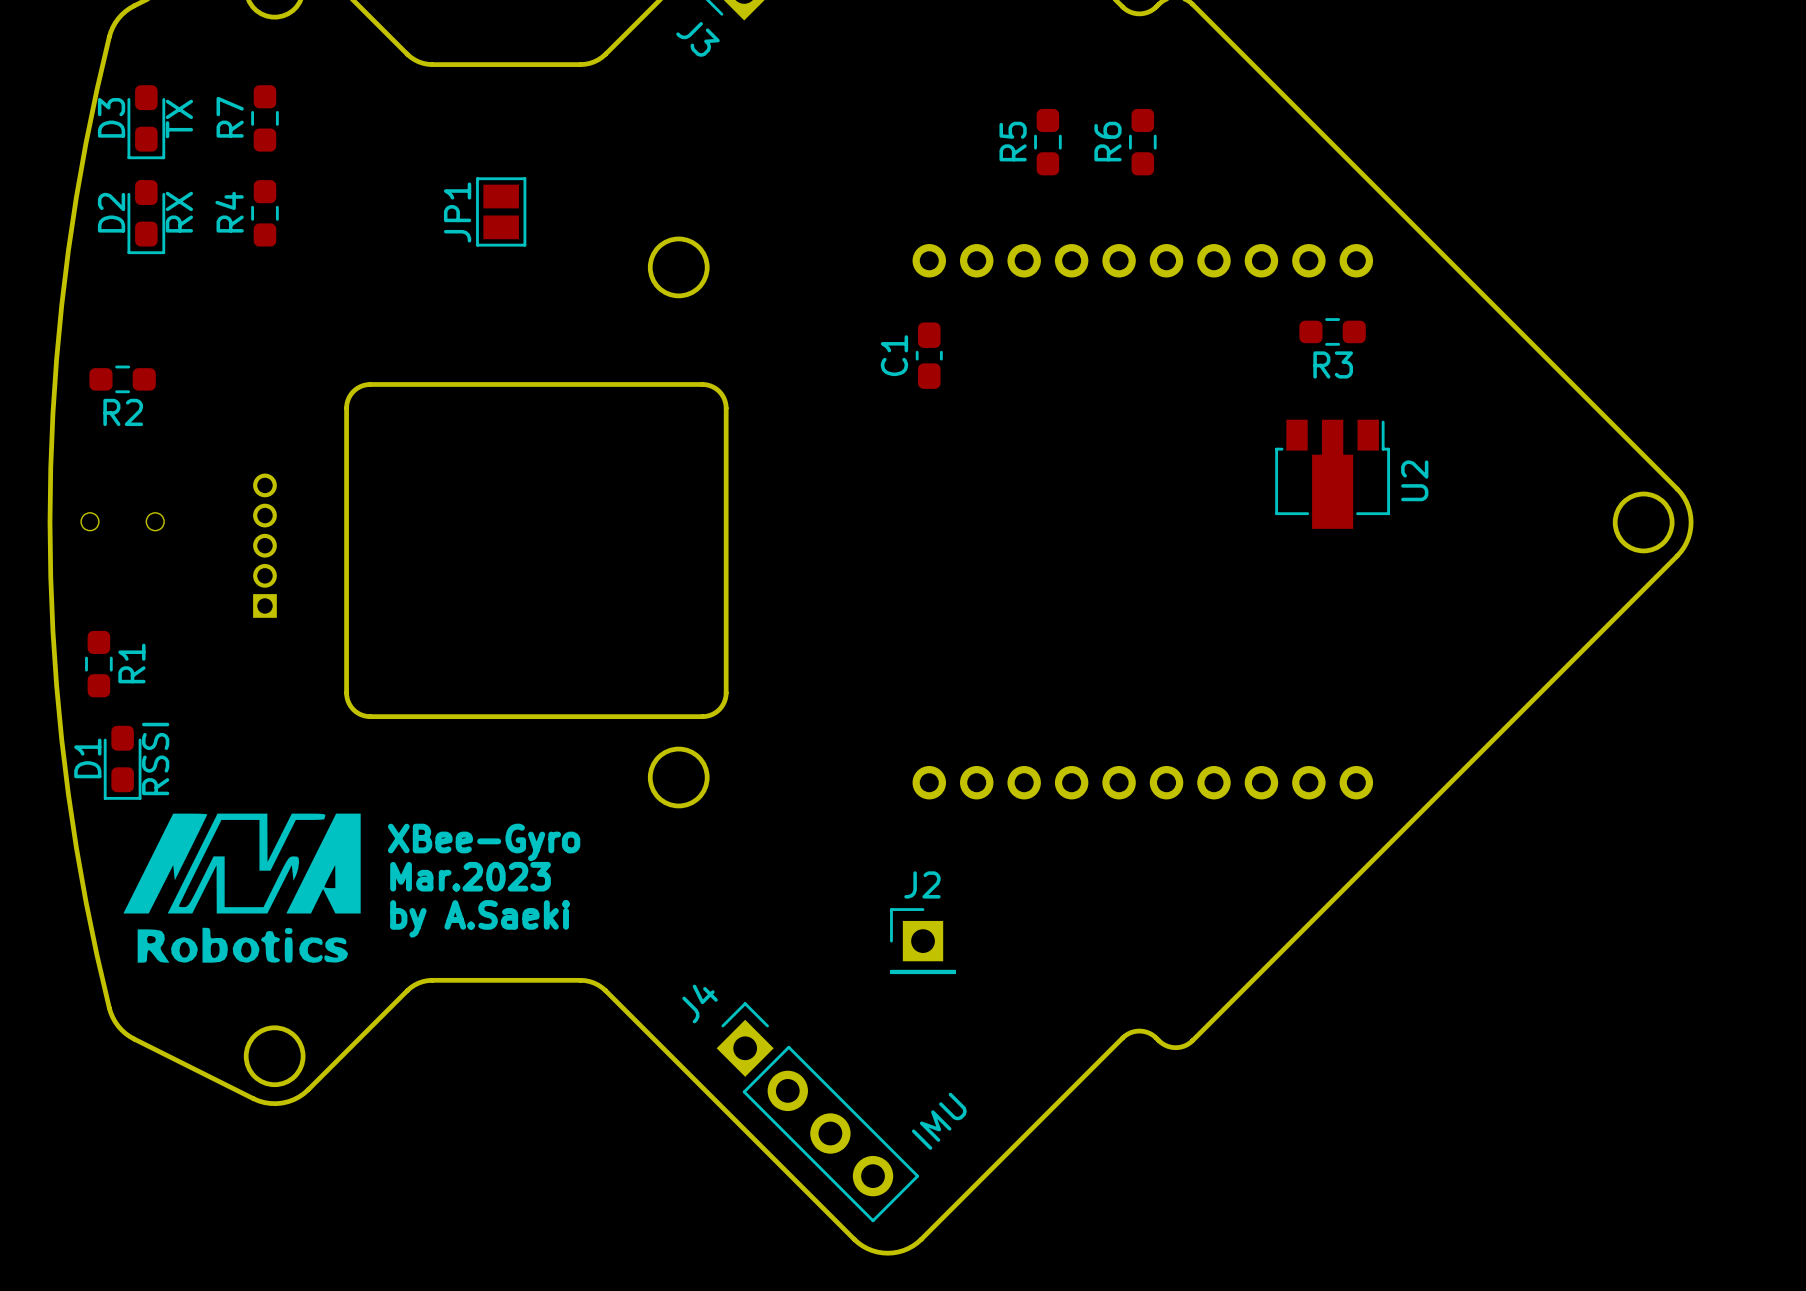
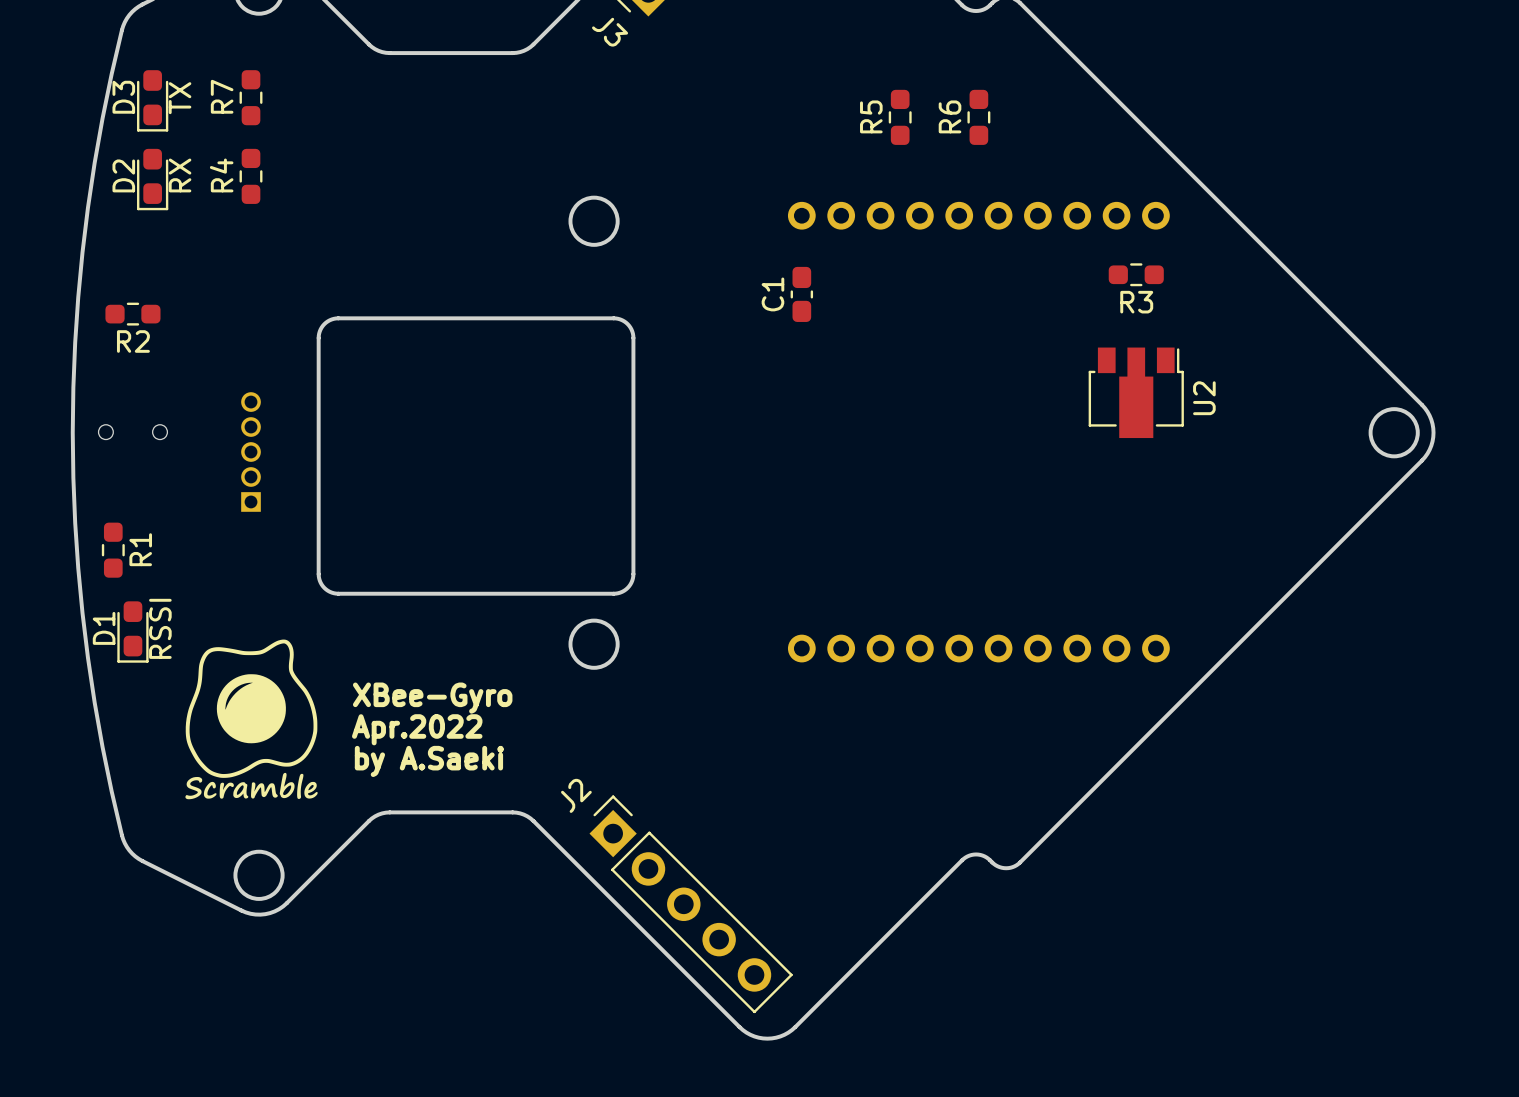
JP1: (501, 211) -> none
drawing: none -> [185, 639, 318, 800]
drawing: [123, 813, 361, 963] -> none
text: Mar.2023 (470, 876) -> Apr.2022 (417, 729)
J2 name position: J2 (922, 884) -> J2 (576, 795)
J2 footprint: [890, 908, 956, 975] -> [589, 795, 793, 1014]
J4: IMU (817, 1112) -> none

